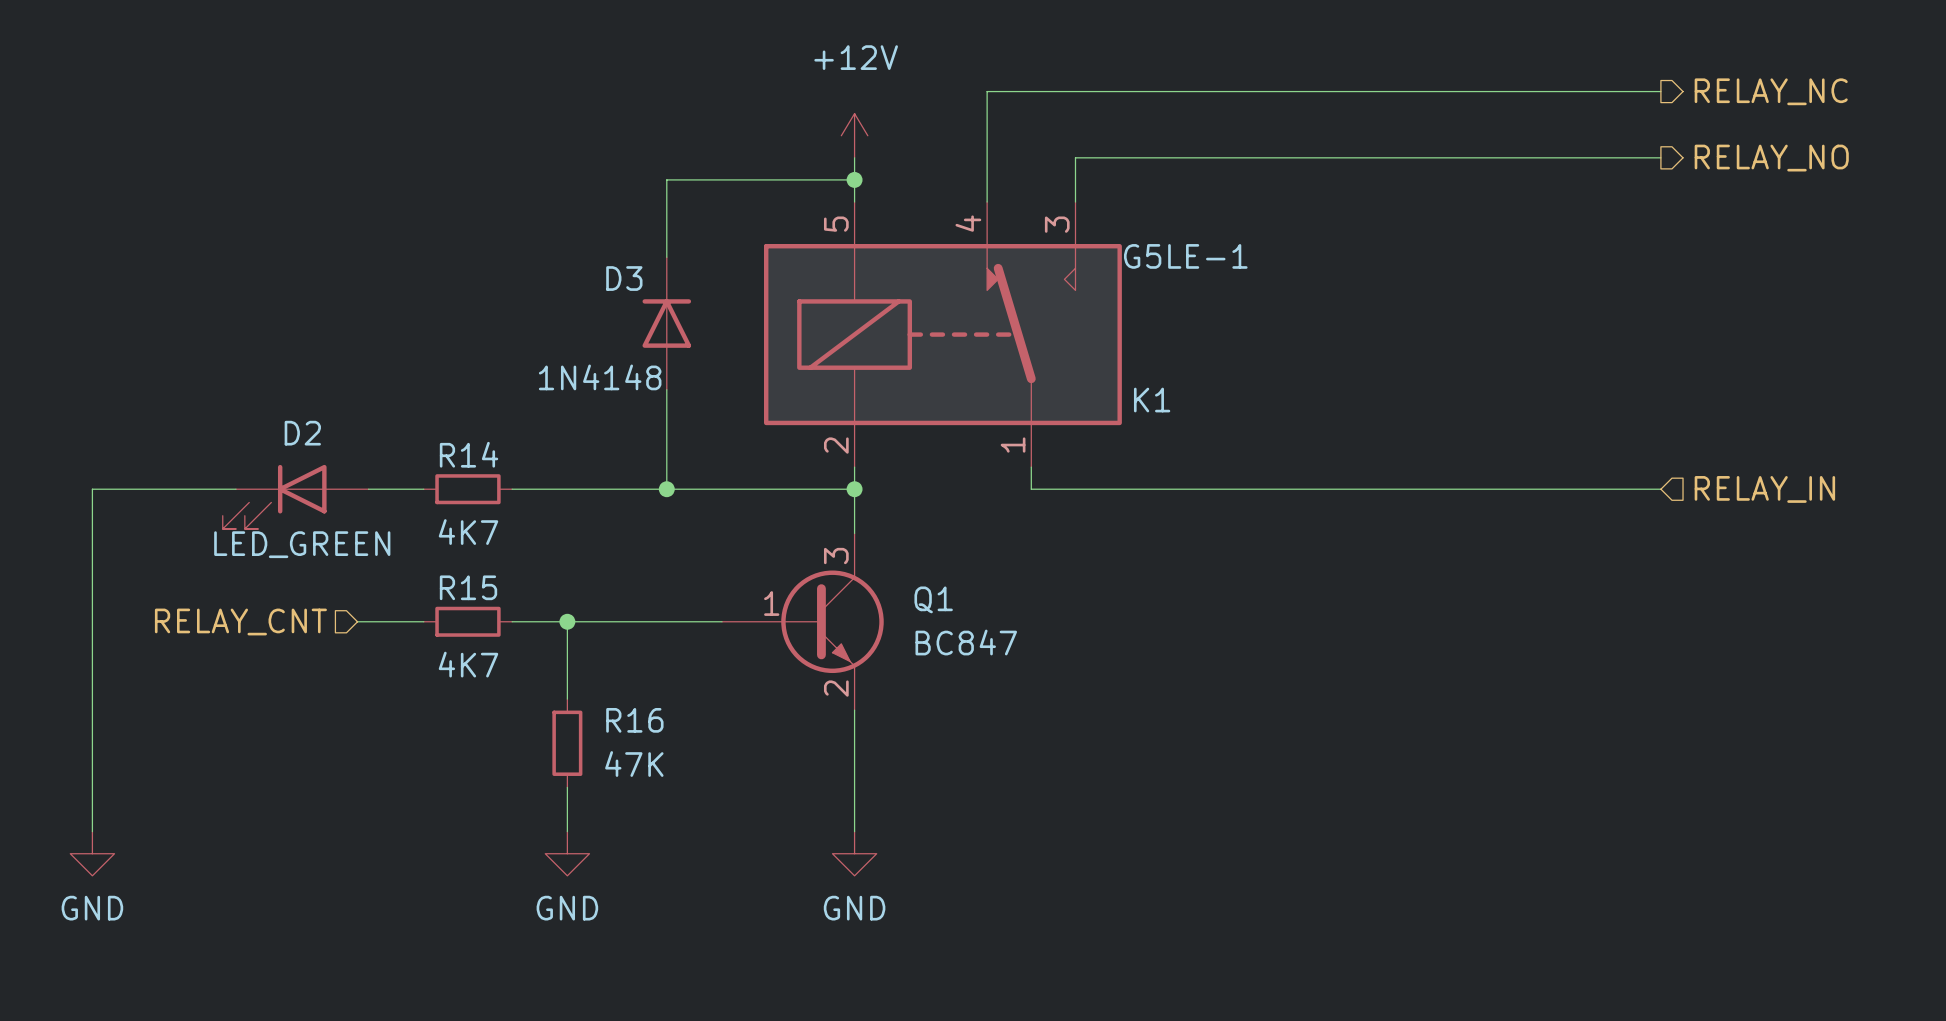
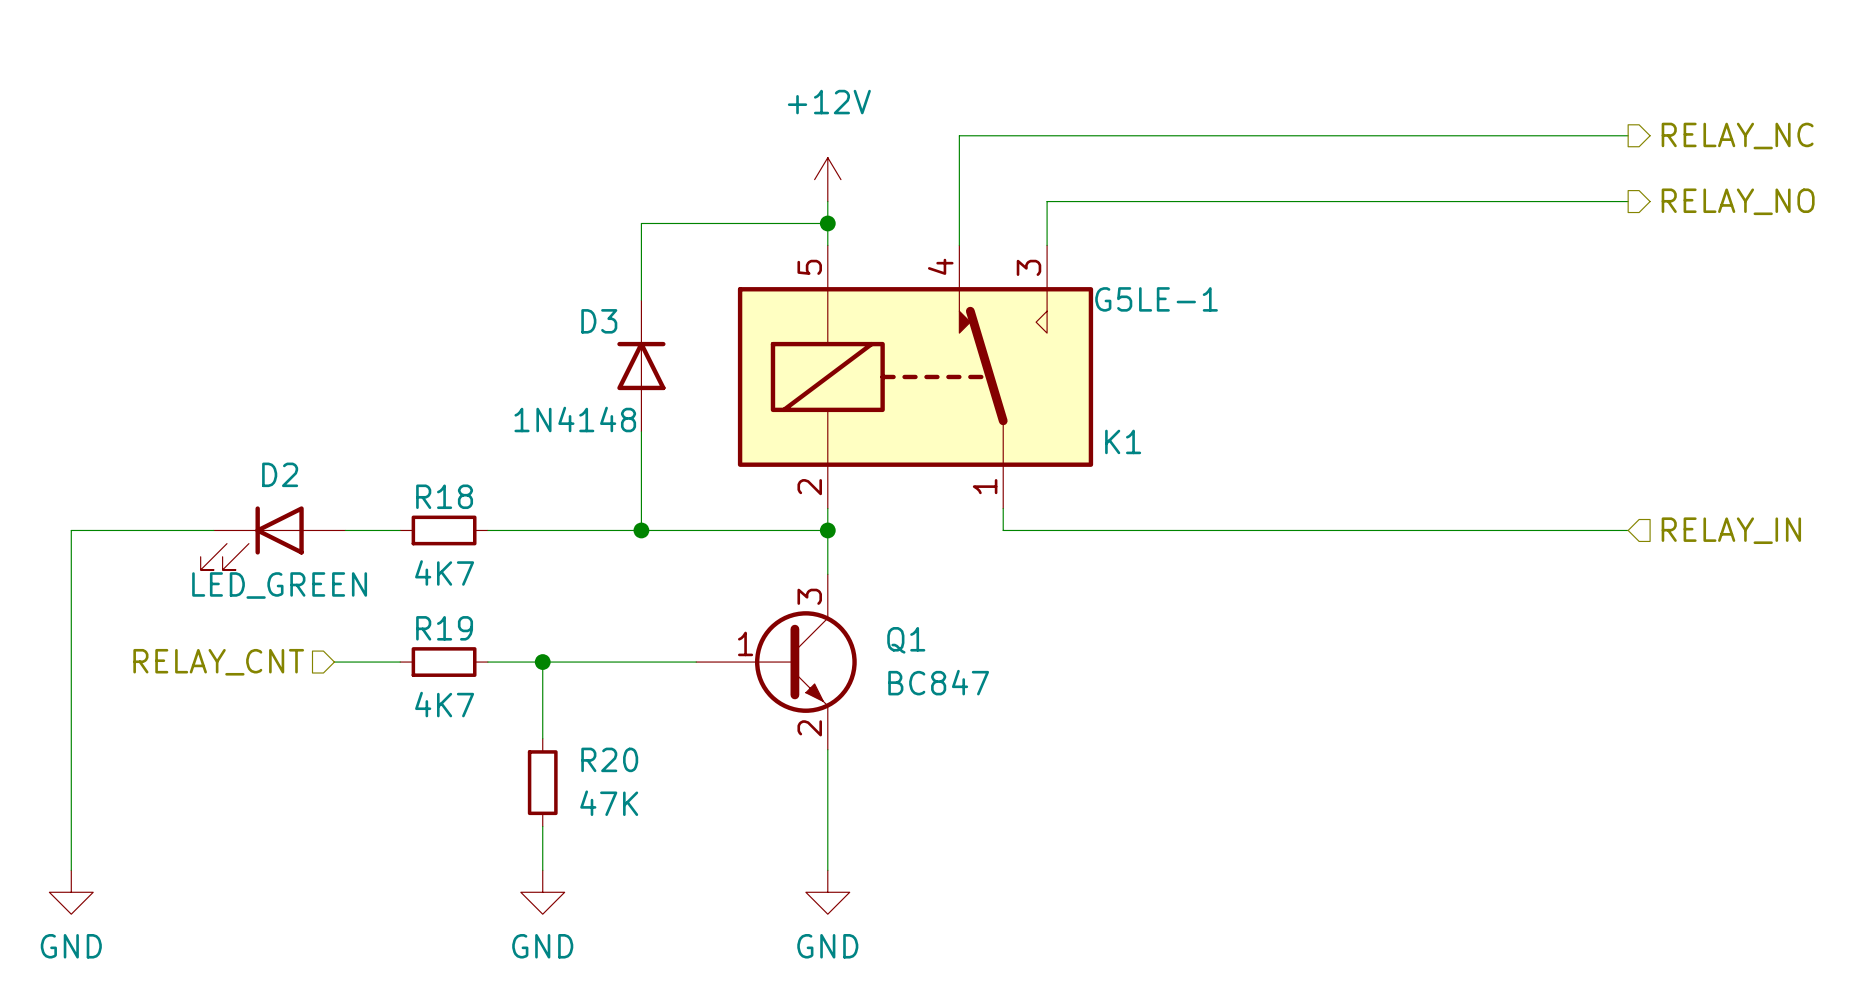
R14 name: R14 (469, 454) -> R18 (444, 496)
R15 name: R15 (468, 587) -> R19 (444, 628)
R16 name: R16 (634, 720) -> R20 (609, 759)

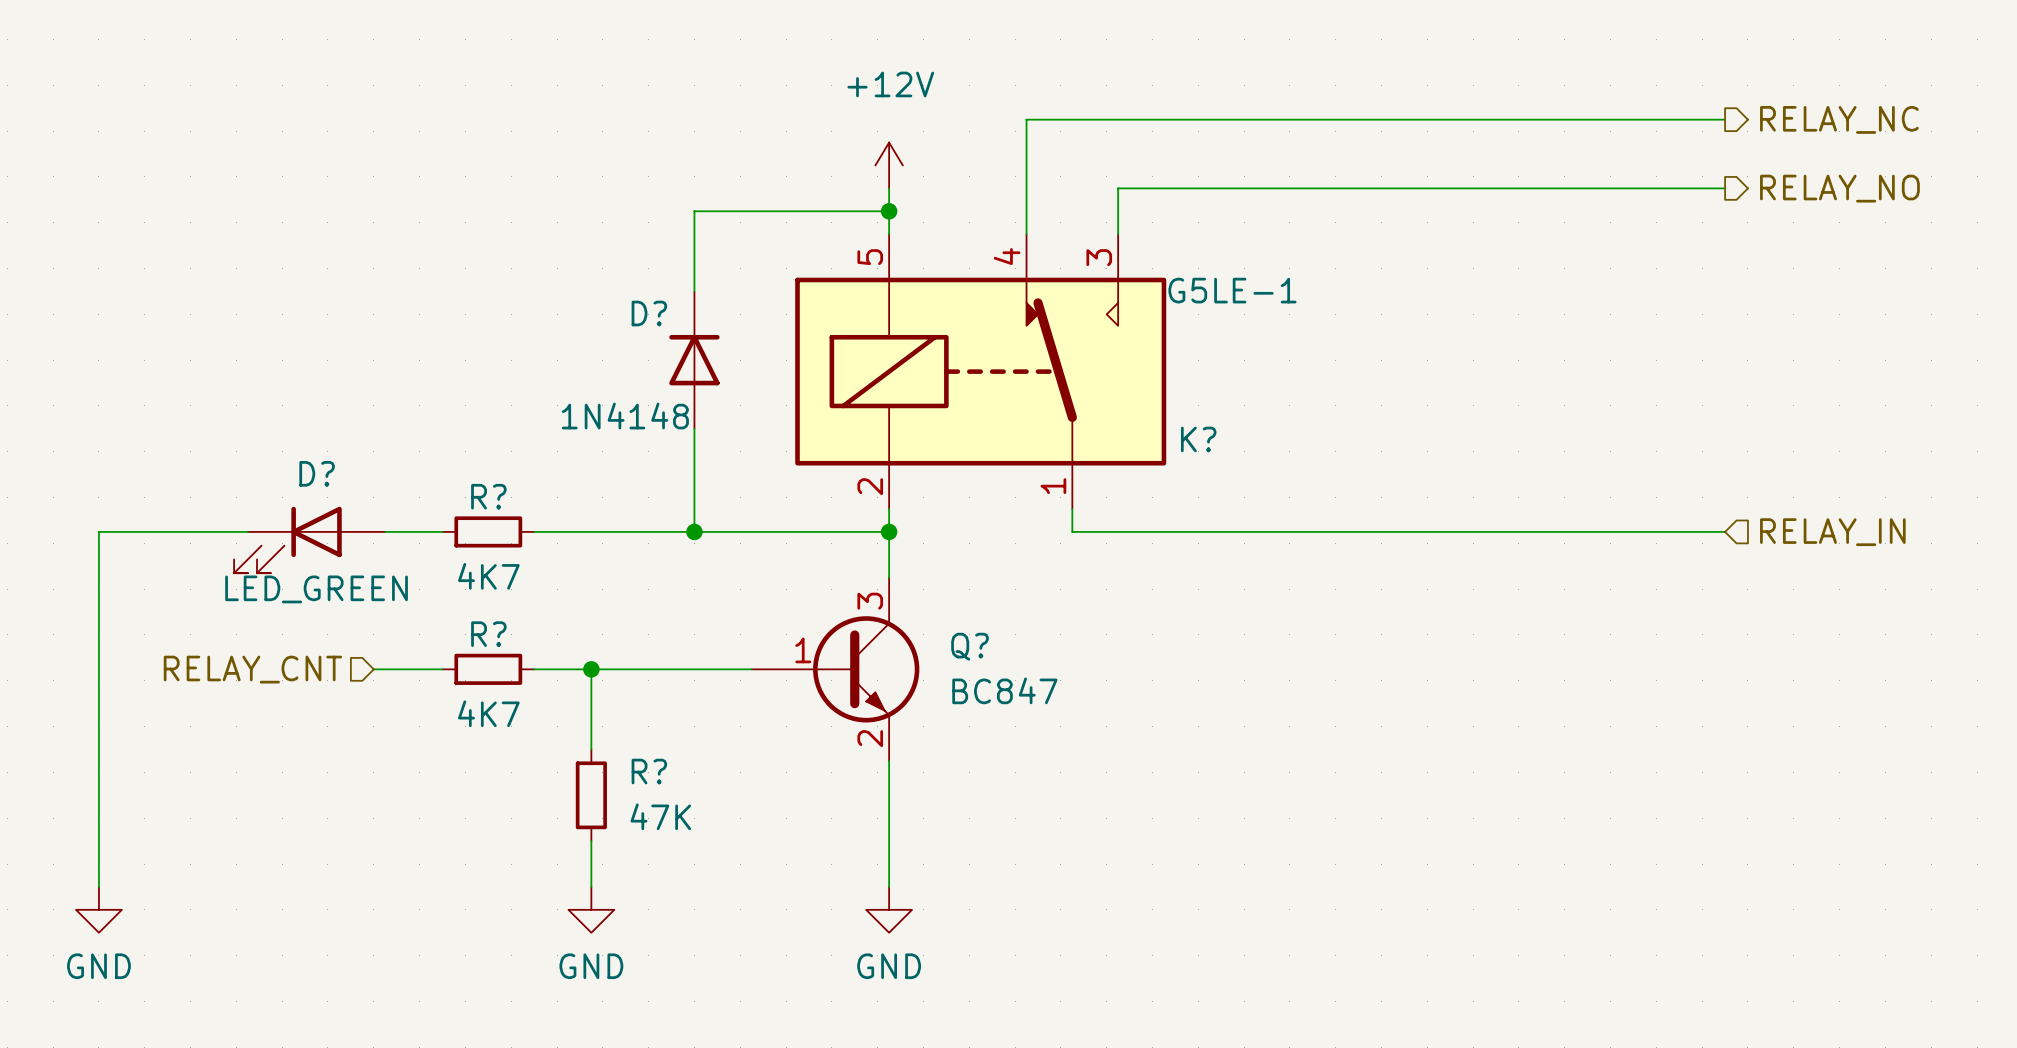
D3 name: D3 (599, 321) -> D? (649, 313)
K1 name: K1 (1123, 441) -> K? (1198, 439)
D2 name: D2 (280, 474) -> D? (317, 473)
R18 name: R18 (444, 496) -> R? (488, 496)
R19 name: R19 (444, 628) -> R? (488, 634)
Q1 name: Q1 (906, 640) -> Q? (969, 646)
R20 name: R20 (609, 759) -> R? (649, 771)

